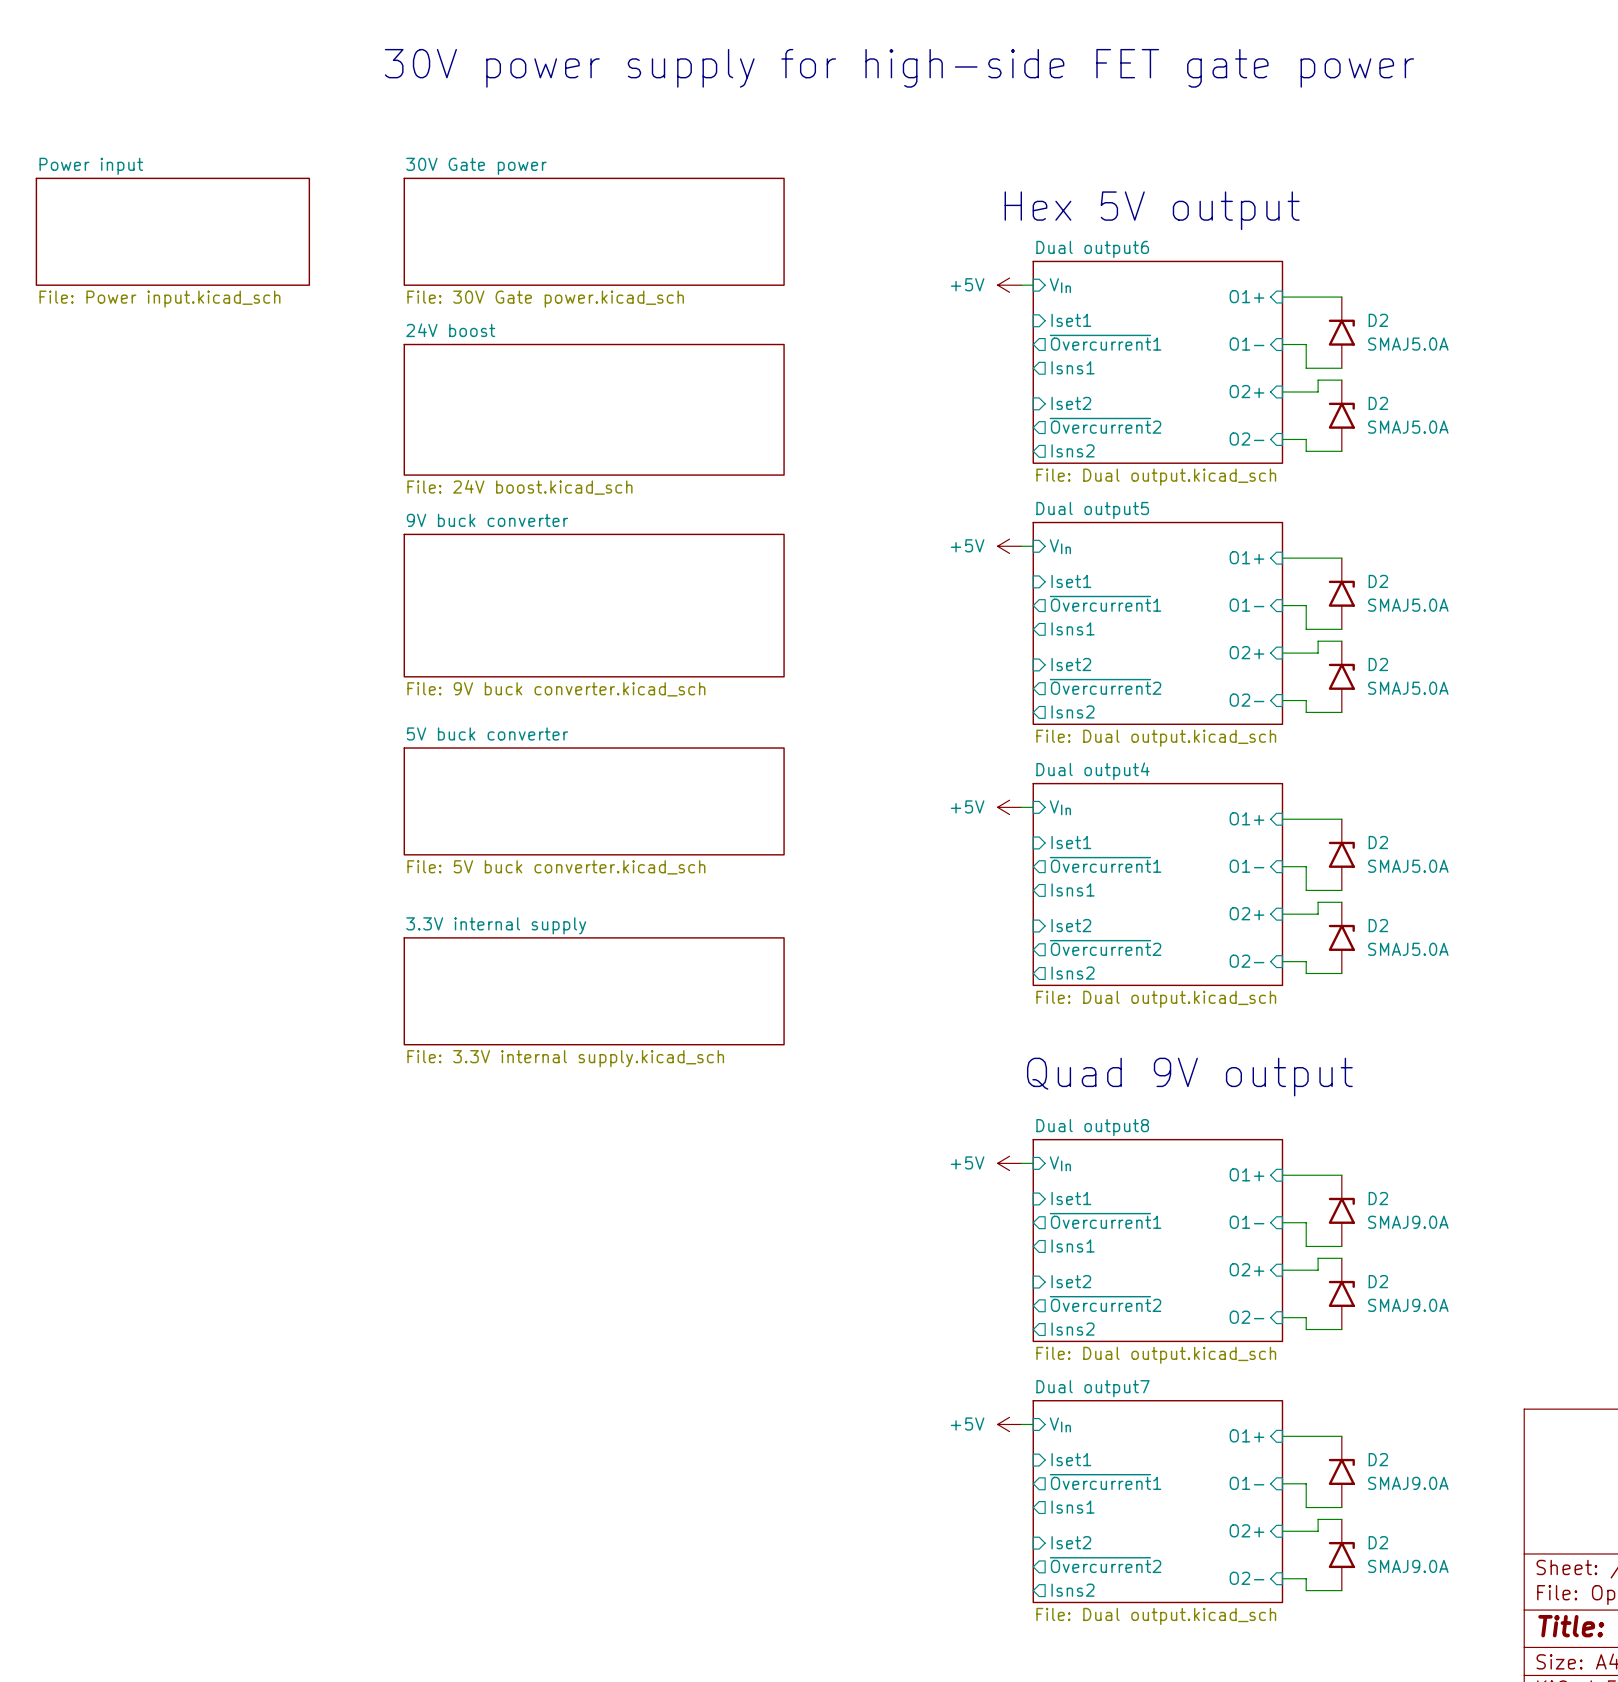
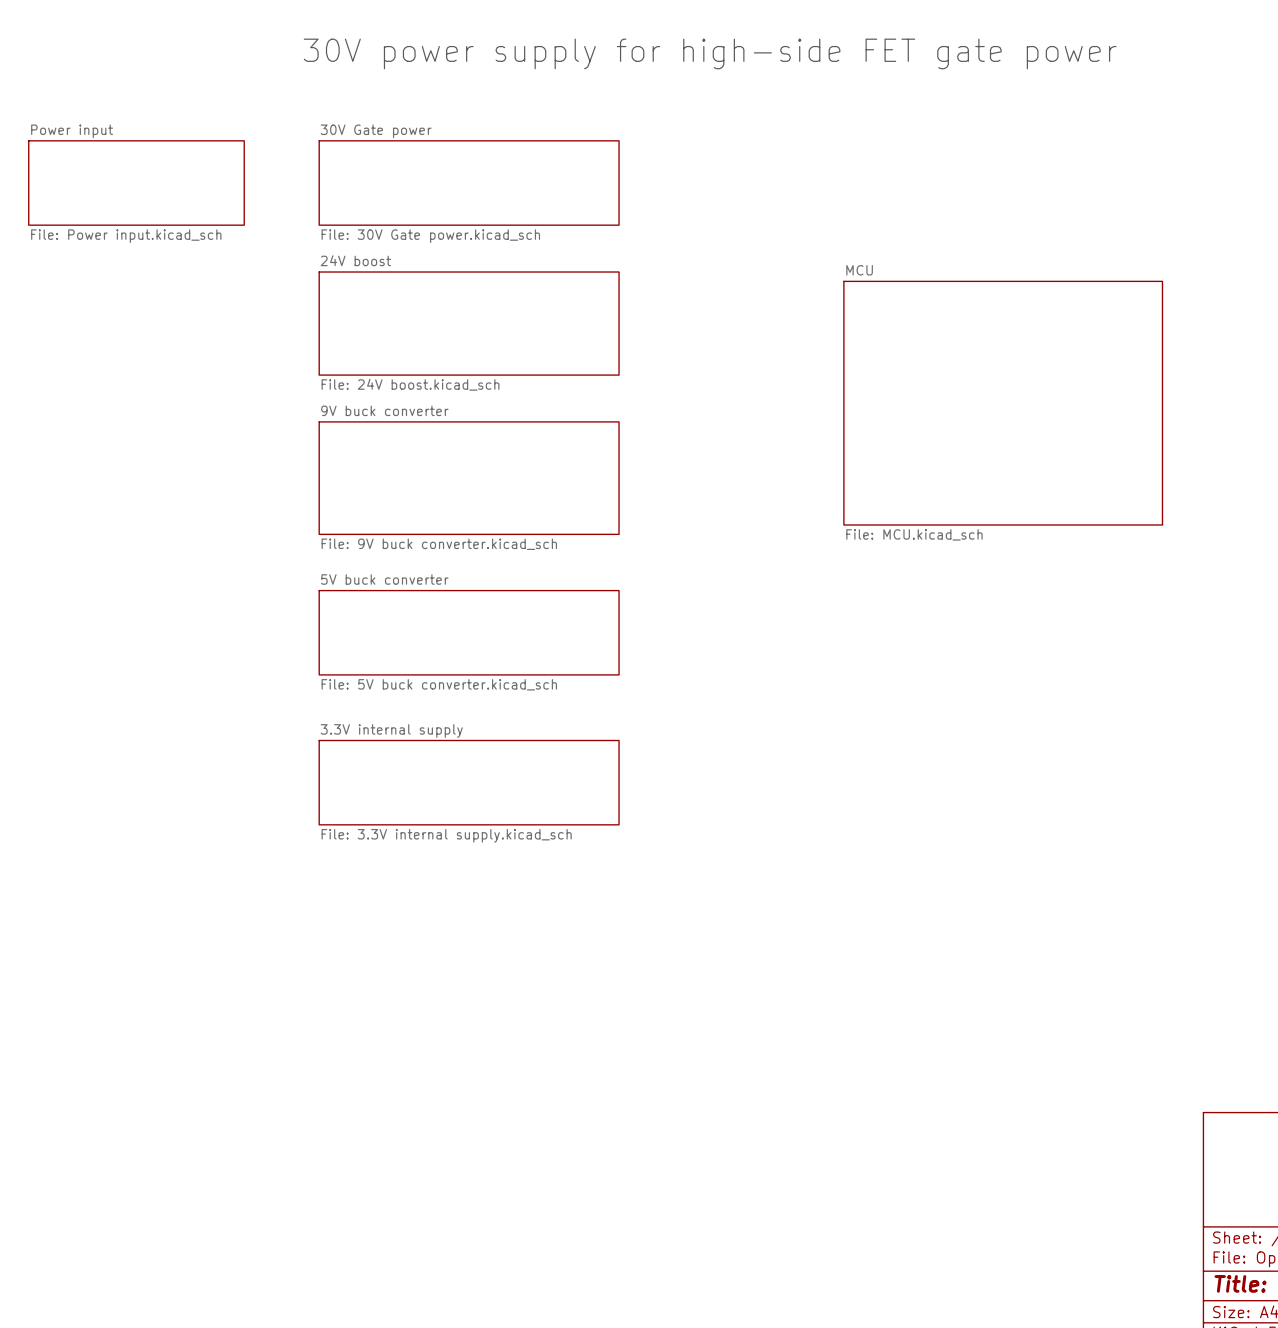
text: Hex 5V output (1152, 210) -> none
power symbol: +5V (1009, 285) -> none
wire: (1021, 285) (1033, 285) -> none
sheet pin: VIn (1060, 285) -> none
sheet pin: O1+ (1246, 296) -> none
wire: (1282, 297) (1341, 297) -> none
sheet pin: Iset1 (1071, 320) -> none
D2: SMAJ5.0A (1341, 332) -> none
sheet pin: ~{Overcurrent}1 (1105, 342) -> none
sheet pin: O1- (1246, 344) -> none
wire: (1282, 344) (1306, 344) (1306, 368) (1341, 368) -> none
sheet Dual output6: File: Dual output.kicad_sch (1157, 362) -> none
sheet pin: Isns1 (1073, 367) -> none
wire: (1341, 380) (1318, 380) (1318, 391) (1282, 391) -> none
sheet pin: O2+ (1246, 391) -> none
sheet pin: Iset2 (1071, 403) -> none
D2: SMAJ5.0A (1341, 415) -> none
sheet pin: ~{Overcurrent}2 (1105, 425) -> none
sheet pin: O2- (1246, 439) -> none
wire: (1282, 439) (1306, 439) (1306, 451) (1341, 451) -> none
sheet pin: Isns2 (1073, 450) -> none
sheet MCU: none -> File: MCU.kicad_sch (1003, 403)
power symbol: +5V (1009, 546) -> none
wire: (1021, 546) (1033, 546) -> none
sheet pin: VIn (1060, 546) -> none
sheet pin: O1+ (1246, 557) -> none
wire: (1282, 558) (1341, 558) -> none
sheet pin: Iset1 (1071, 581) -> none
D2: SMAJ5.0A (1341, 593) -> none
sheet pin: ~{Overcurrent}1 (1105, 603) -> none
sheet pin: O1- (1246, 605) -> none
wire: (1282, 605) (1306, 605) (1306, 629) (1341, 629) -> none
sheet Dual output5: File: Dual output.kicad_sch (1157, 623) -> none
sheet pin: Isns1 (1073, 628) -> none
wire: (1341, 641) (1318, 641) (1318, 653) (1282, 653) -> none
sheet pin: O2+ (1246, 652) -> none
sheet pin: Iset2 (1071, 664) -> none
D2: SMAJ5.0A (1341, 676) -> none
sheet pin: ~{Overcurrent}2 (1105, 686) -> none
sheet pin: O2- (1246, 700) -> none
wire: (1282, 700) (1306, 700) (1306, 712) (1341, 712) -> none
sheet pin: Isns2 (1073, 711) -> none
power symbol: +5V (1009, 807) -> none
wire: (1021, 807) (1033, 807) -> none
sheet pin: VIn (1060, 807) -> none
sheet pin: O1+ (1246, 818) -> none
wire: (1282, 819) (1341, 819) -> none
sheet pin: Iset1 (1071, 842) -> none
D2: SMAJ5.0A (1341, 854) -> none
sheet pin: ~{Overcurrent}1 (1105, 864) -> none
sheet pin: O1- (1246, 866) -> none
wire: (1282, 866) (1306, 866) (1306, 890) (1341, 890) -> none
sheet Dual output4: File: Dual output.kicad_sch (1157, 884) -> none
sheet pin: Isns1 (1073, 889) -> none
wire: (1341, 902) (1318, 902) (1318, 914) (1282, 914) -> none
sheet pin: O2+ (1246, 913) -> none
sheet pin: Iset2 (1071, 925) -> none
D2: SMAJ5.0A (1341, 937) -> none
sheet pin: ~{Overcurrent}2 (1105, 947) -> none
sheet pin: O2- (1246, 961) -> none
wire: (1282, 961) (1306, 961) (1306, 973) (1341, 973) -> none
sheet pin: Isns2 (1073, 973) -> none
text: Quad 9V output (1189, 1077) -> none
power symbol: +5V (1009, 1163) -> none
wire: (1021, 1163) (1033, 1163) -> none
sheet pin: VIn (1060, 1163) -> none
sheet pin: O1+ (1246, 1174) -> none
wire: (1282, 1175) (1341, 1175) -> none
sheet pin: Iset1 (1071, 1198) -> none
D2: SMAJ9.0A (1341, 1210) -> none
sheet pin: ~{Overcurrent}1 (1105, 1220) -> none
sheet pin: O1- (1246, 1222) -> none
wire: (1282, 1222) (1306, 1222) (1306, 1246) (1341, 1246) -> none
sheet Dual output8: File: Dual output.kicad_sch (1157, 1240) -> none
sheet pin: Isns1 (1073, 1246) -> none
wire: (1341, 1258) (1318, 1258) (1318, 1270) (1282, 1270) -> none
sheet pin: O2+ (1246, 1269) -> none
sheet pin: Iset2 (1071, 1281) -> none
D2: SMAJ9.0A (1341, 1293) -> none
sheet pin: ~{Overcurrent}2 (1105, 1303) -> none
sheet pin: O2- (1246, 1317) -> none
wire: (1282, 1317) (1306, 1317) (1306, 1329) (1341, 1329) -> none
sheet pin: Isns2 (1073, 1329) -> none
power symbol: +5V (1009, 1424) -> none
wire: (1021, 1424) (1033, 1424) -> none
sheet pin: VIn (1060, 1424) -> none
sheet pin: O1+ (1246, 1435) -> none
wire: (1282, 1436) (1341, 1436) -> none
sheet pin: Iset1 (1071, 1459) -> none
D2: SMAJ9.0A (1341, 1471) -> none
sheet pin: ~{Overcurrent}1 (1105, 1481) -> none
sheet pin: O1- (1246, 1483) -> none
wire: (1282, 1483) (1306, 1483) (1306, 1507) (1341, 1507) -> none
sheet Dual output7: File: Dual output.kicad_sch (1157, 1501) -> none
sheet pin: Isns1 (1073, 1507) -> none
wire: (1341, 1519) (1318, 1519) (1318, 1531) (1282, 1531) -> none
sheet pin: O2+ (1246, 1530) -> none
sheet pin: Iset2 (1071, 1542) -> none
D2: SMAJ9.0A (1341, 1555) -> none
sheet pin: ~{Overcurrent}2 (1105, 1565) -> none
sheet pin: O2- (1246, 1578) -> none
wire: (1282, 1578) (1306, 1578) (1306, 1590) (1341, 1590) -> none
sheet pin: Isns2 (1073, 1590) -> none

